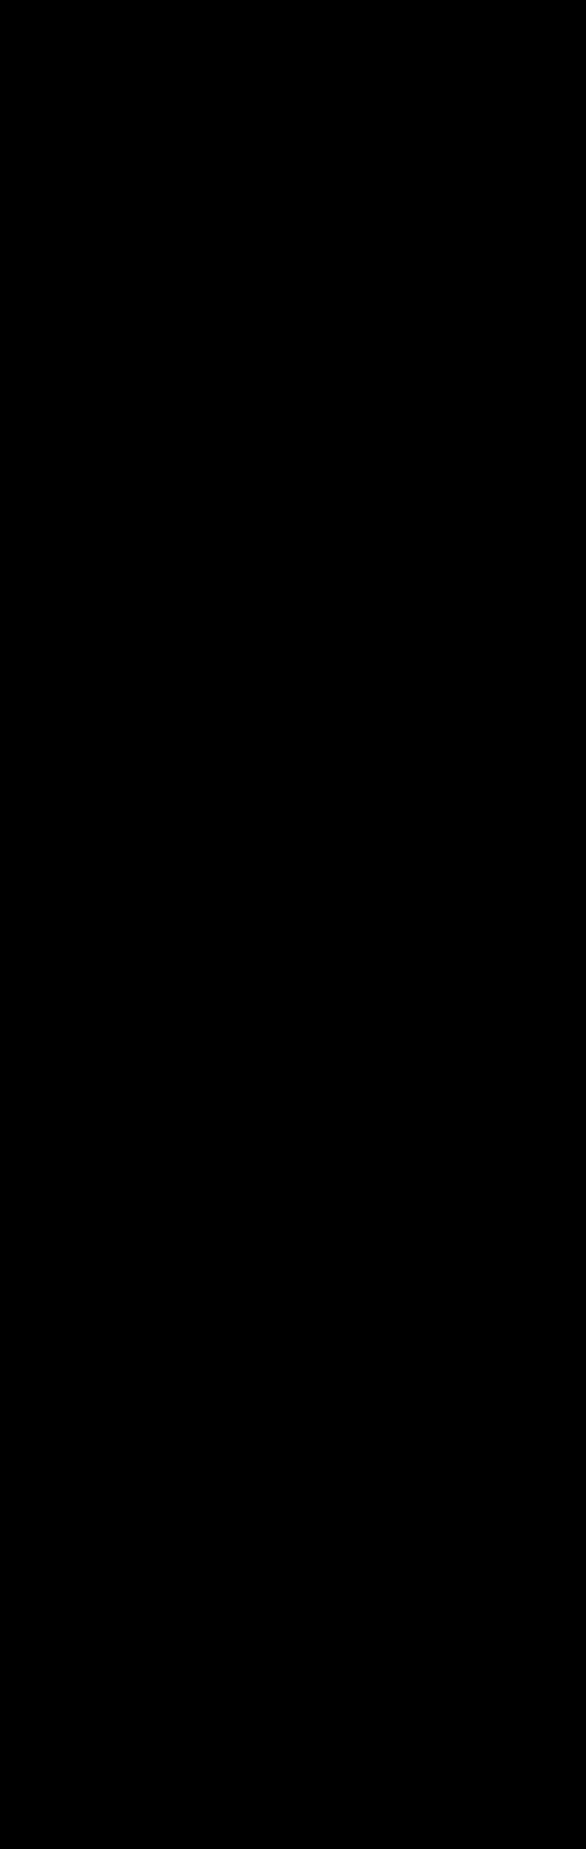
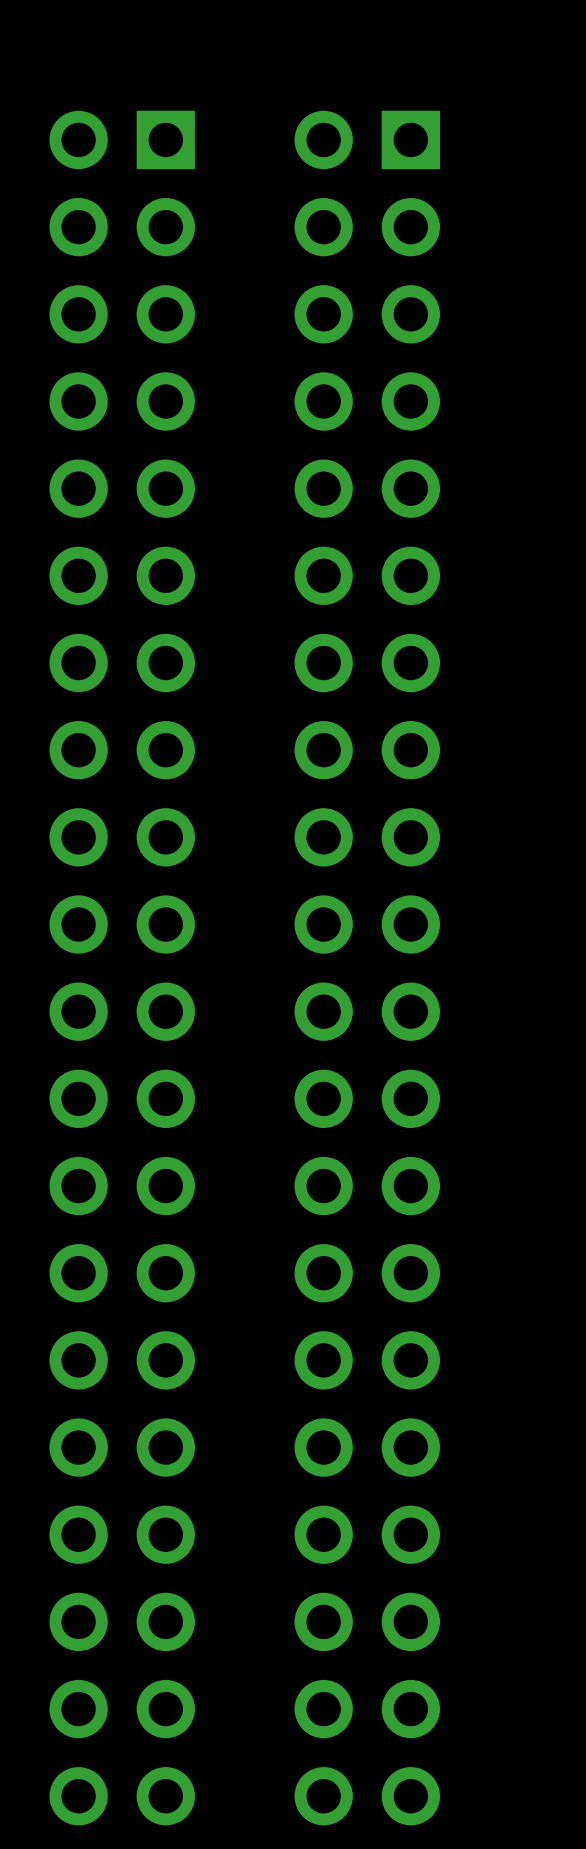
part: none -> (122, 968)
part: none -> (367, 968)

